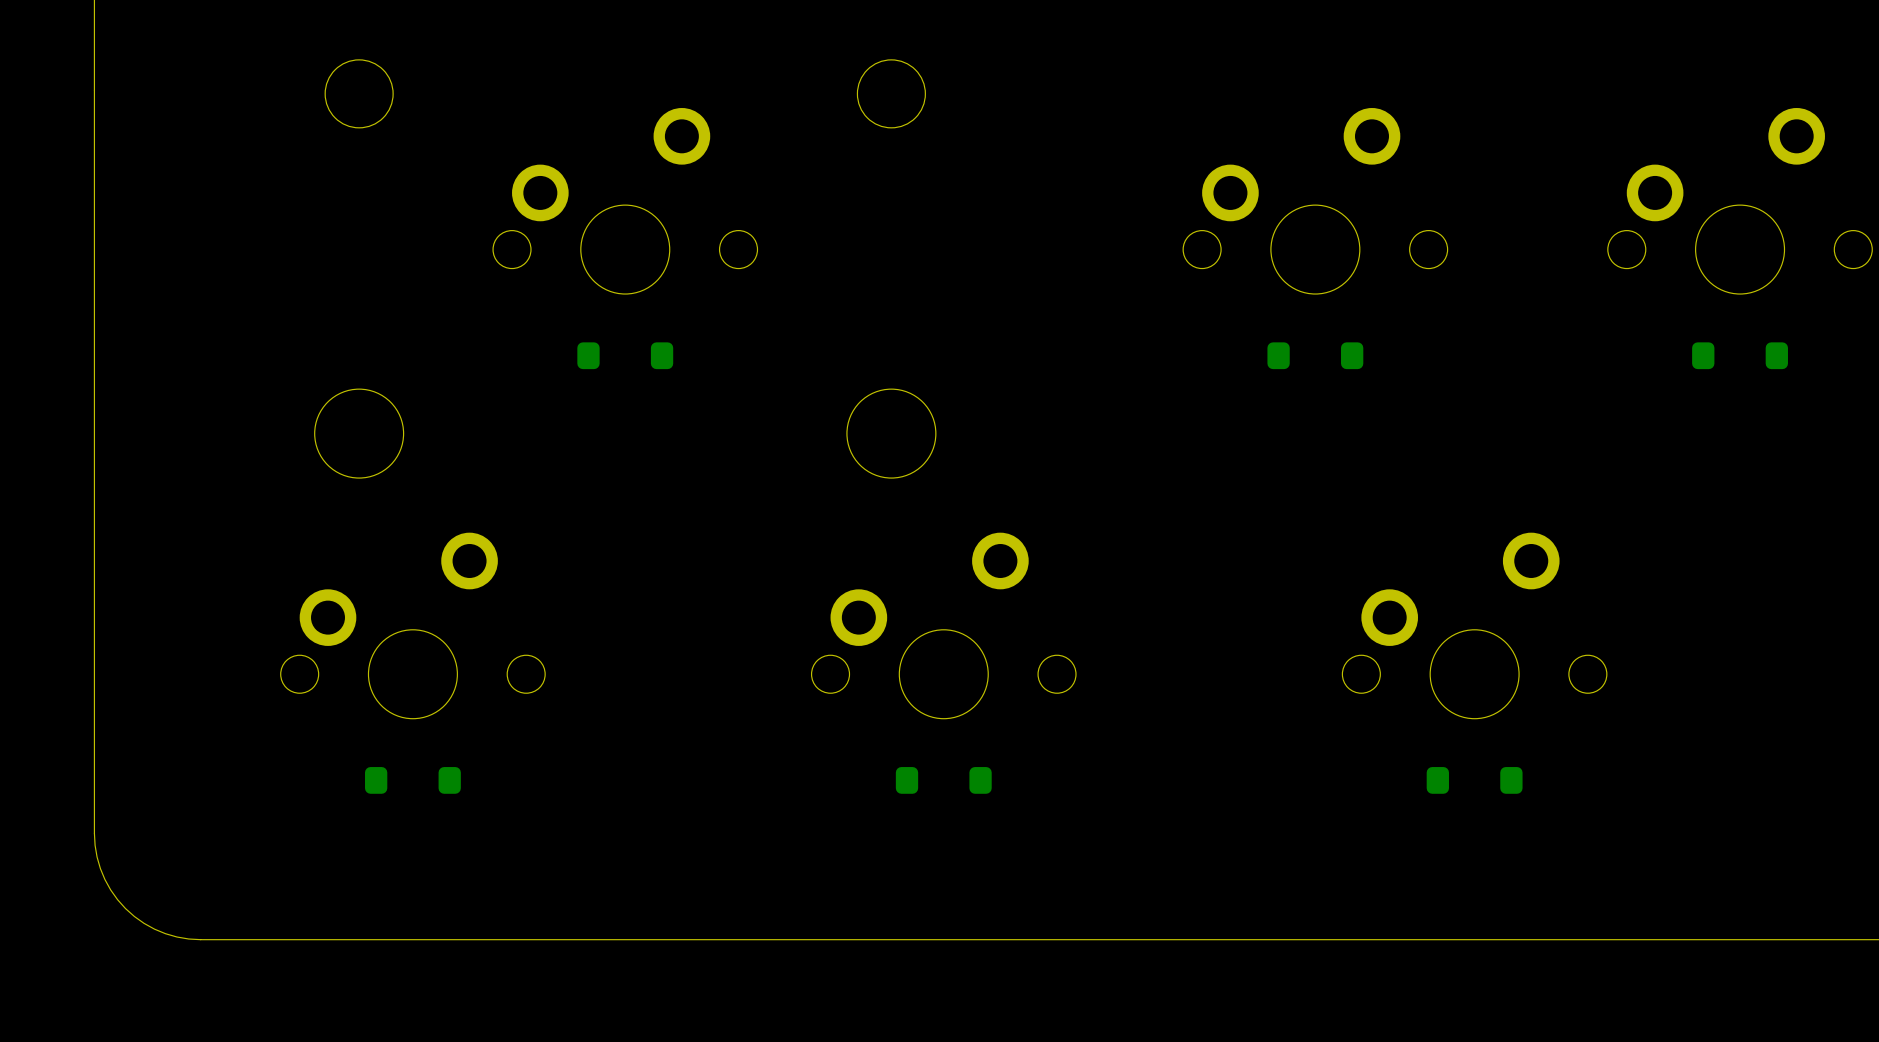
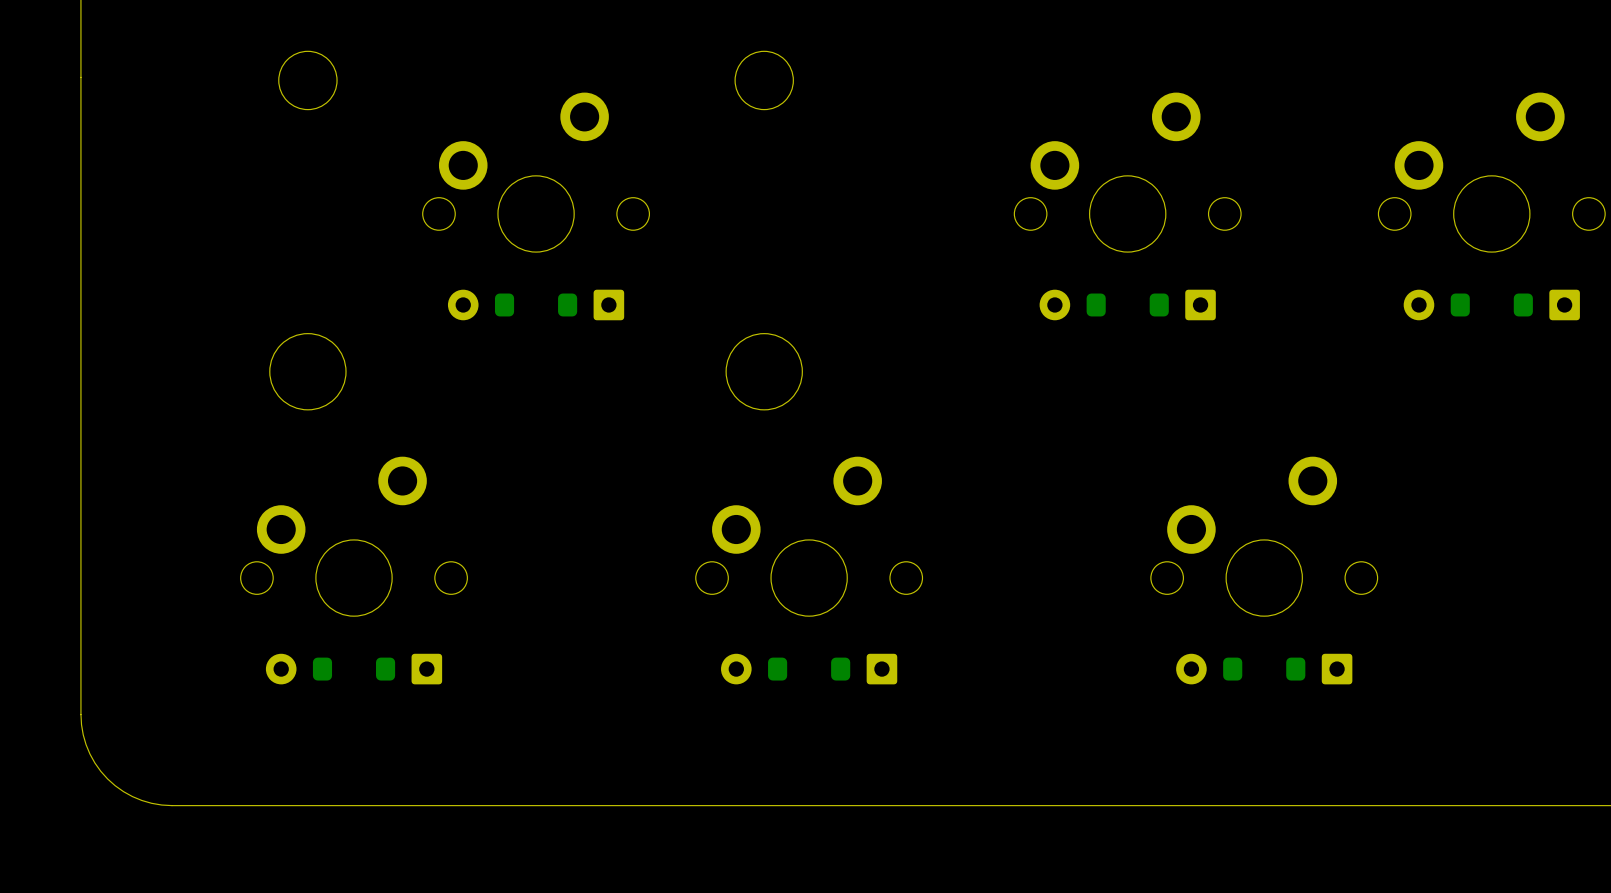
part footprint: [577, 342, 674, 370] -> [447, 289, 625, 321]
part footprint: [1267, 342, 1364, 370] -> [1039, 289, 1216, 321]
part footprint: [1692, 342, 1788, 370] -> [1403, 289, 1580, 321]
part footprint: [365, 767, 461, 794] -> [265, 653, 443, 685]
part footprint: [895, 767, 992, 794] -> [721, 653, 898, 685]
part footprint: [1426, 767, 1523, 794] -> [1176, 653, 1353, 685]

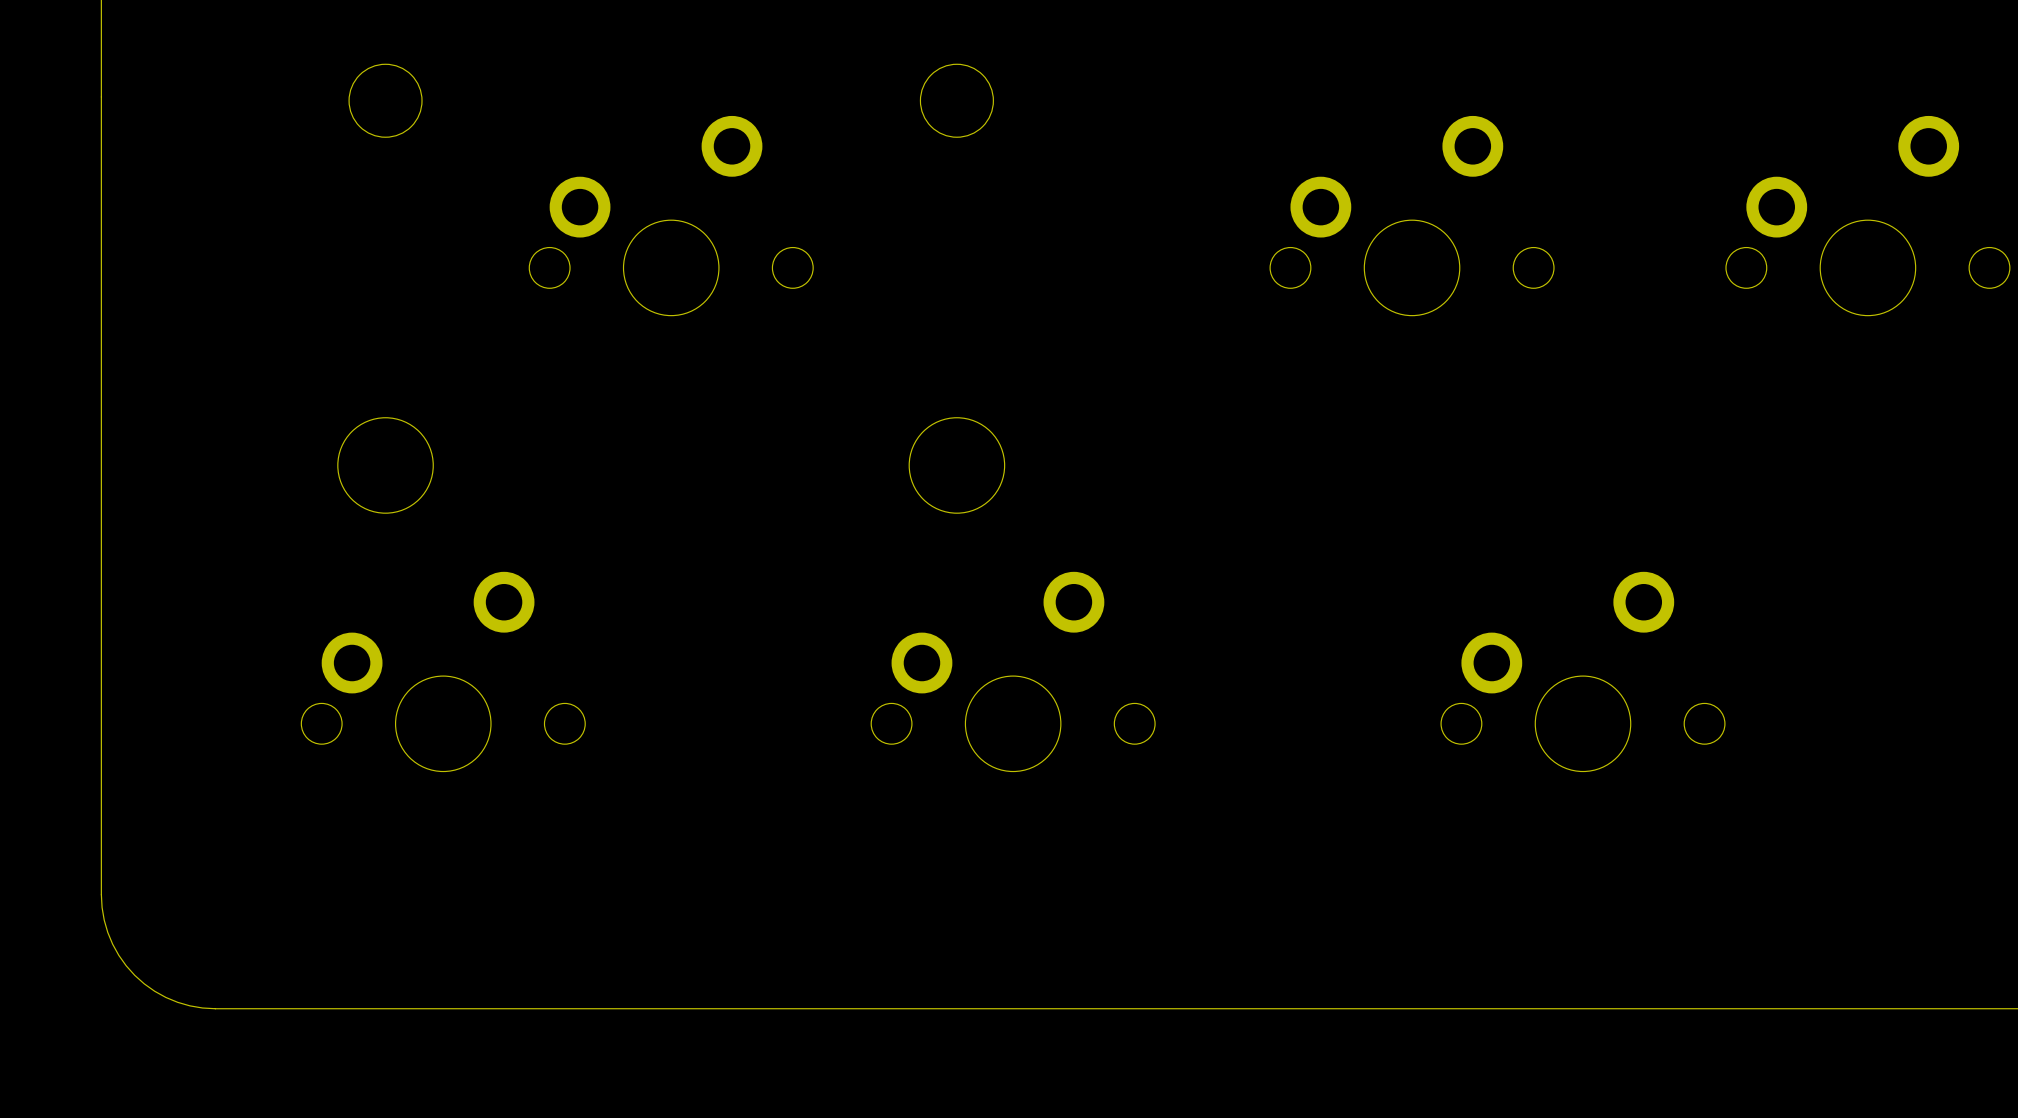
part: (536, 304) -> none
part: (1127, 304) -> none
part: (1491, 304) -> none
part: (354, 669) -> none
part: (809, 669) -> none
part: (1264, 669) -> none

